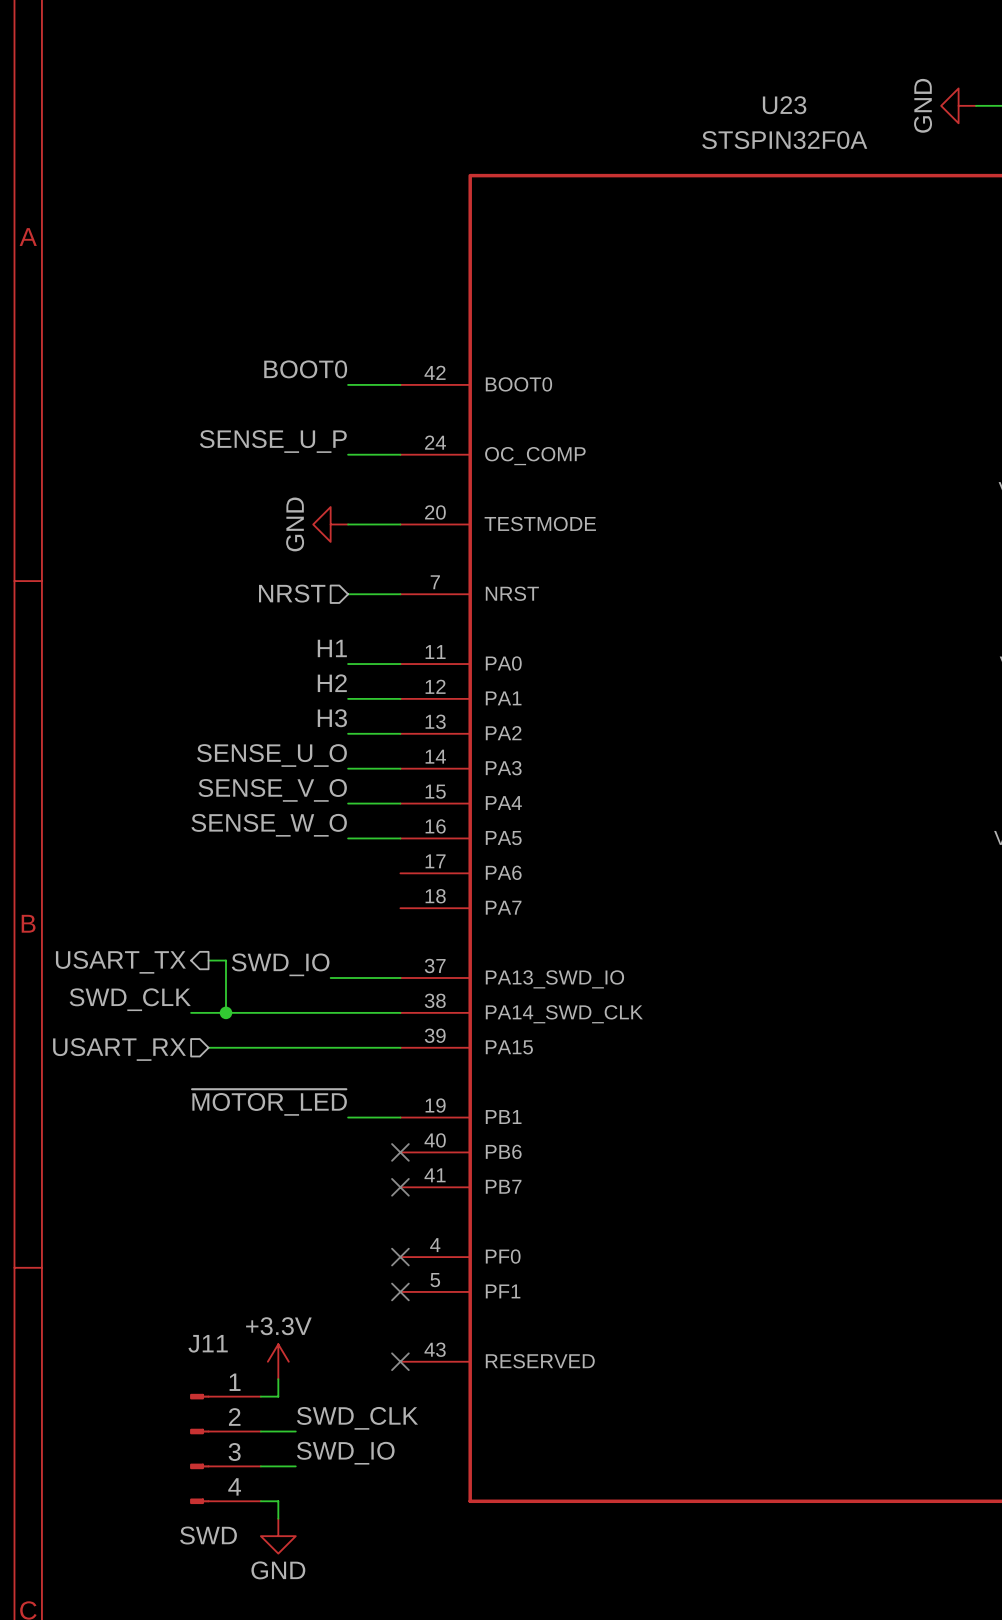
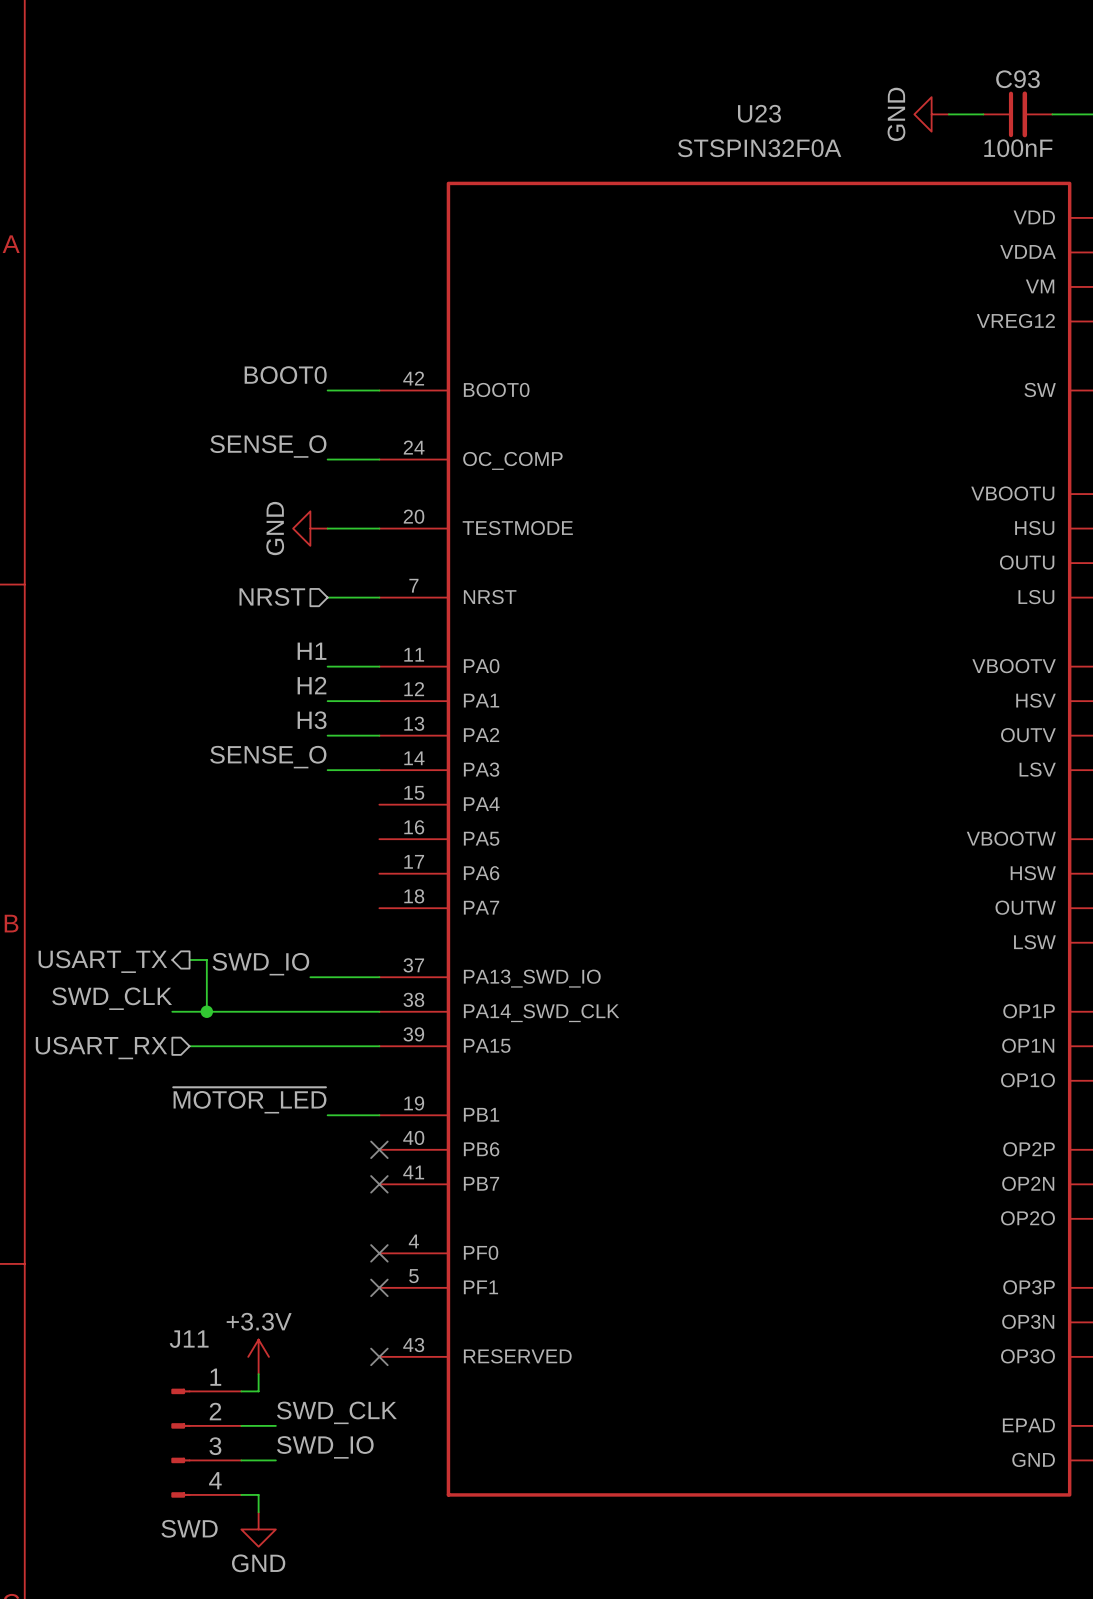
label: SENSE_U_P (273, 441) -> SENSE_O (268, 446)
label: SENSE_U_O (271, 755) -> SENSE_O (268, 757)
label: SENSE_V_O (272, 790) -> none
wire: (348, 803) (400, 803) -> none
label: SENSE_W_O (269, 825) -> none
wire: (348, 838) (400, 838) -> none

